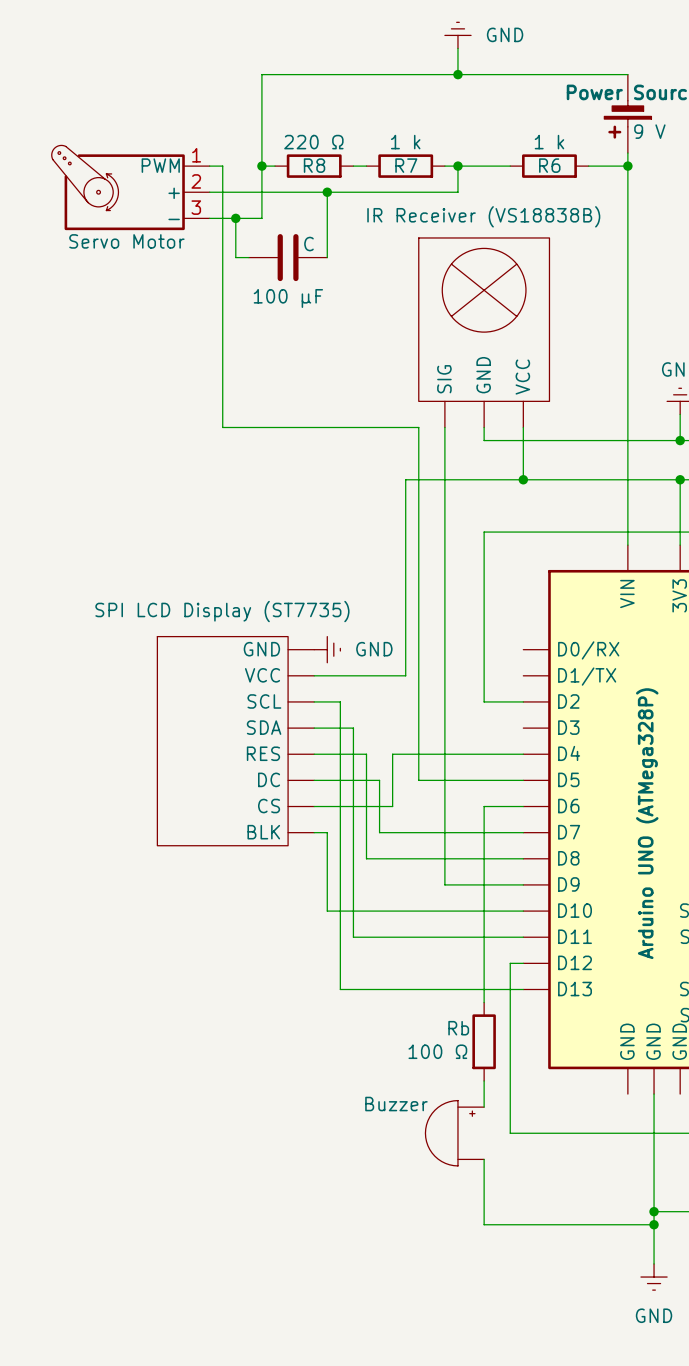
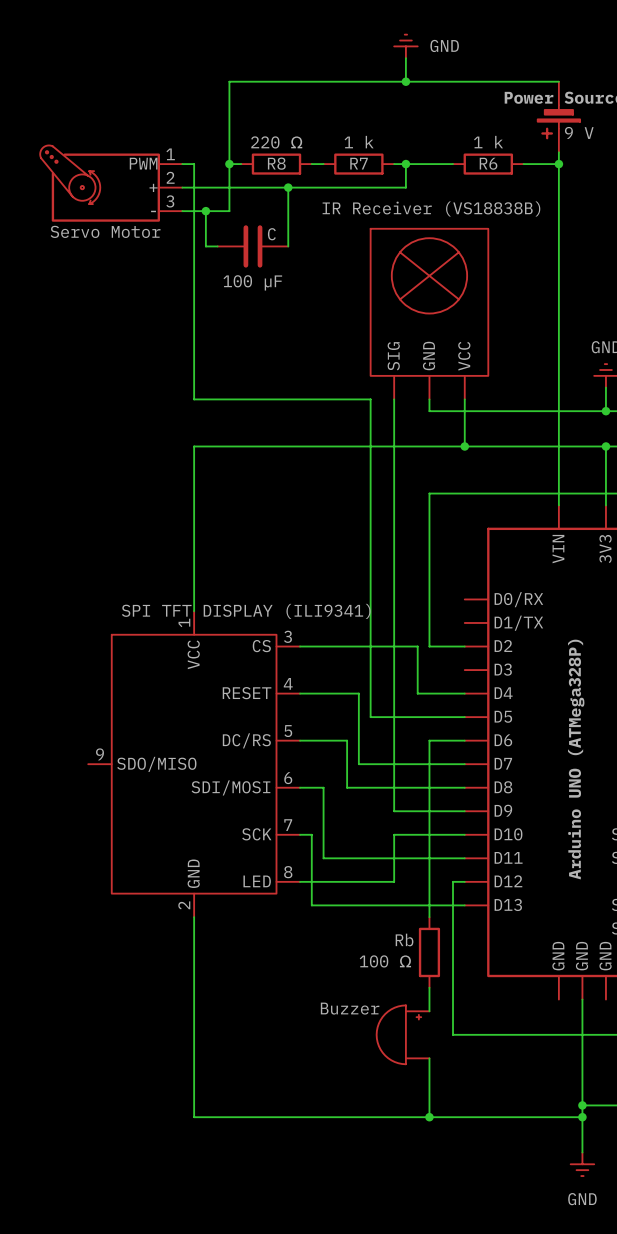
wire: (405, 479) (405, 675) (314, 675) -> (358, 446) (194, 446) (194, 611)
power symbol: GND (327, 649) -> none
wire: (314, 701) (340, 701) (340, 989) (353, 989) -> none
wire: (314, 728) (353, 728) (353, 911) (444, 911) -> (300, 881) (394, 881) (394, 834)
part: SPI LCD Display (ST7735) (235, 741) -> none
wire: (366, 754) (366, 858) (392, 858) -> (347, 740) (347, 787)
wire: (392, 754) (392, 806) -> (347, 693) (323, 693)
wire: (405, 754) (471, 754) -> (300, 646) (417, 646) (417, 693)
wire: (314, 780) (379, 780) (379, 832) (405, 832) -> (358, 693) (358, 764)
part: none -> SPI TFT DISPLAY (ILI9341) (194, 764)
wire: (314, 832) (327, 832) (327, 911) (340, 911) -> none
wire: none -> (300, 787) (323, 787) (323, 858)
wire: (353, 937) (366, 937) -> (311, 858) (311, 905)
wire: none -> (194, 917) (194, 1117) (429, 1117)
junction: none -> (429, 1117)

